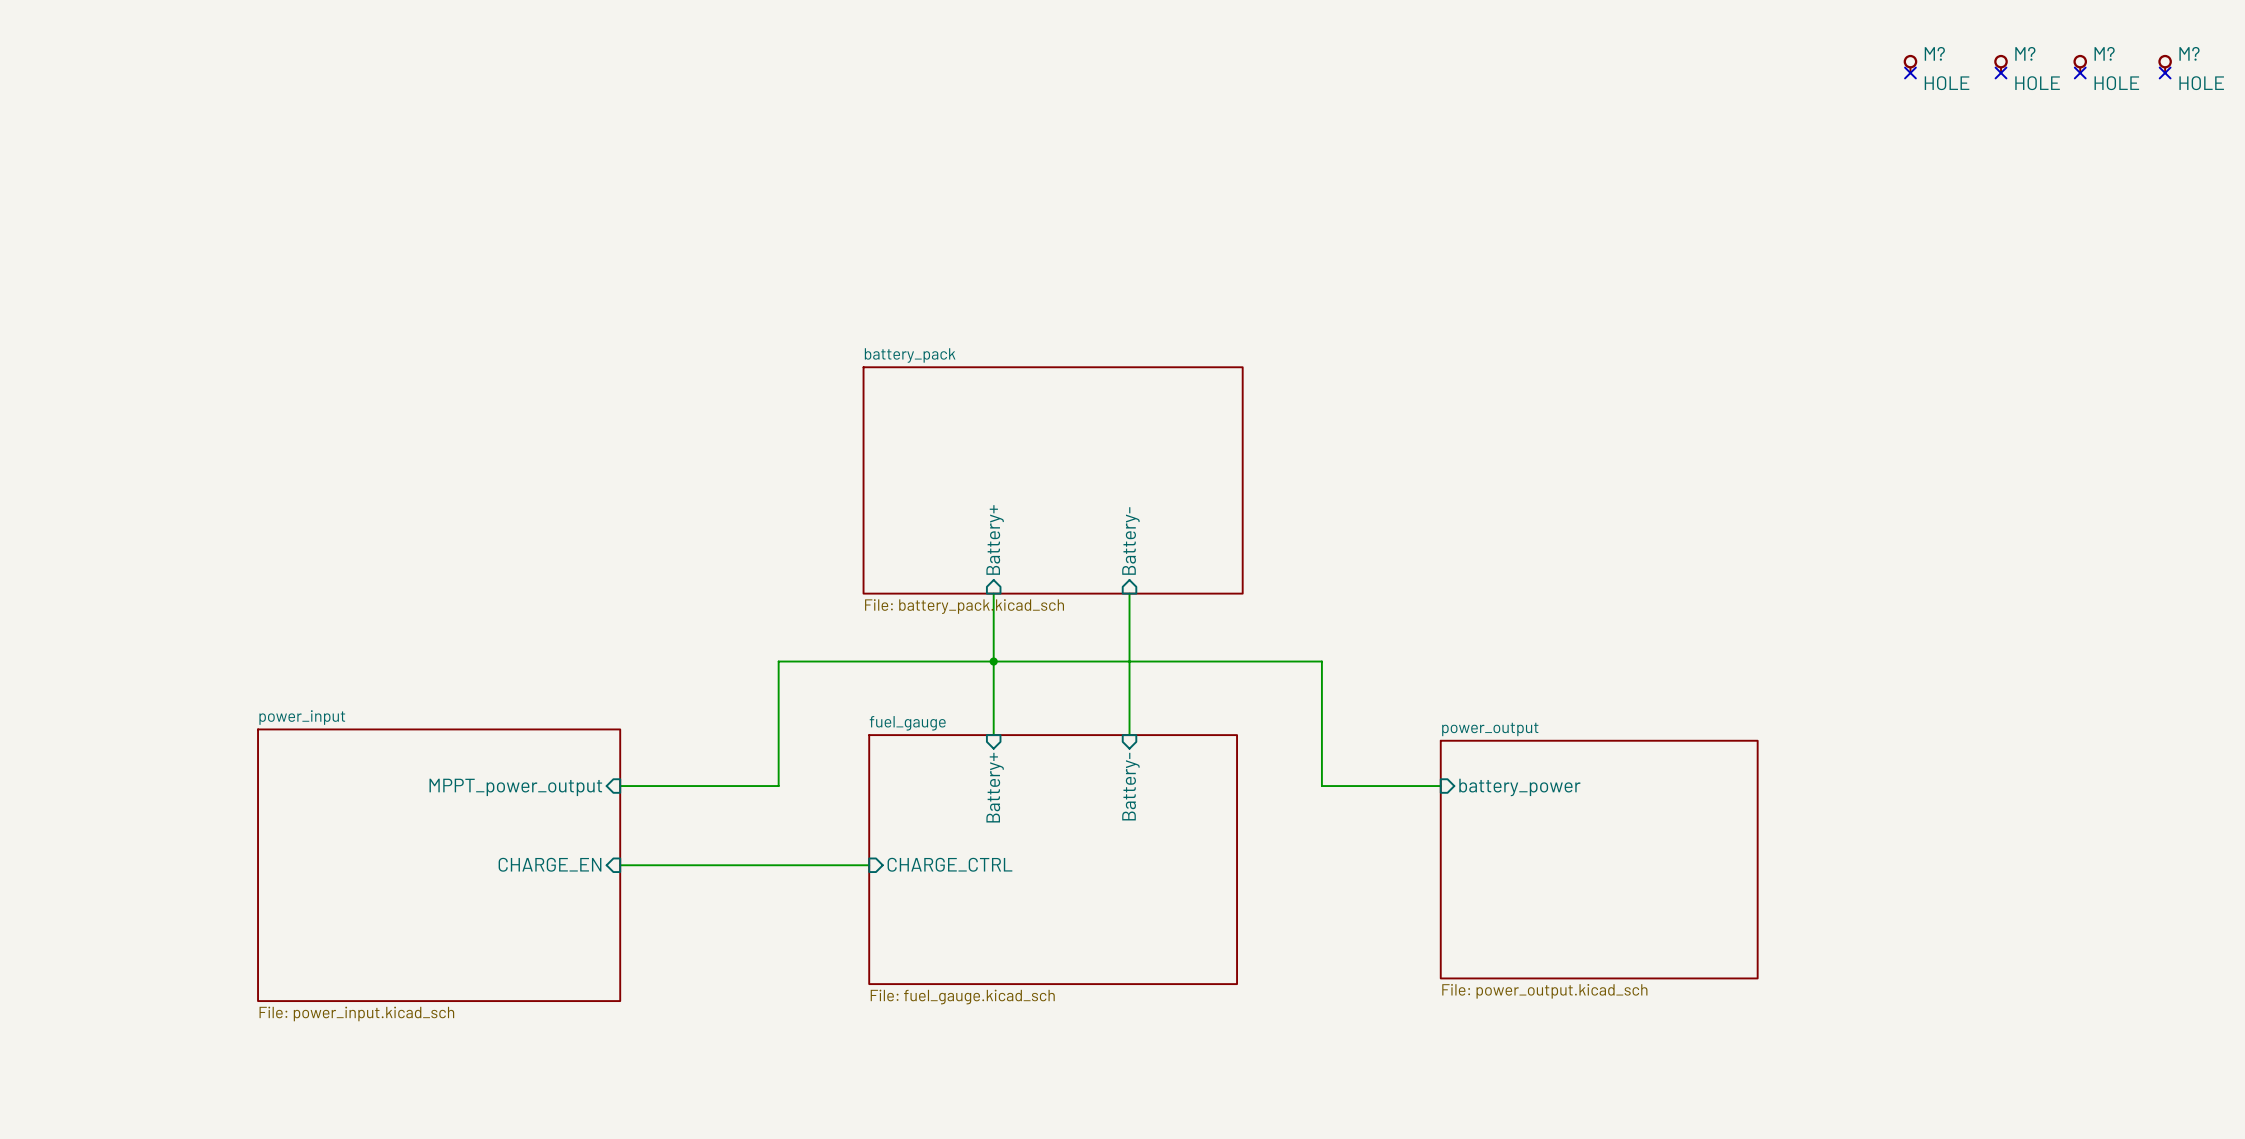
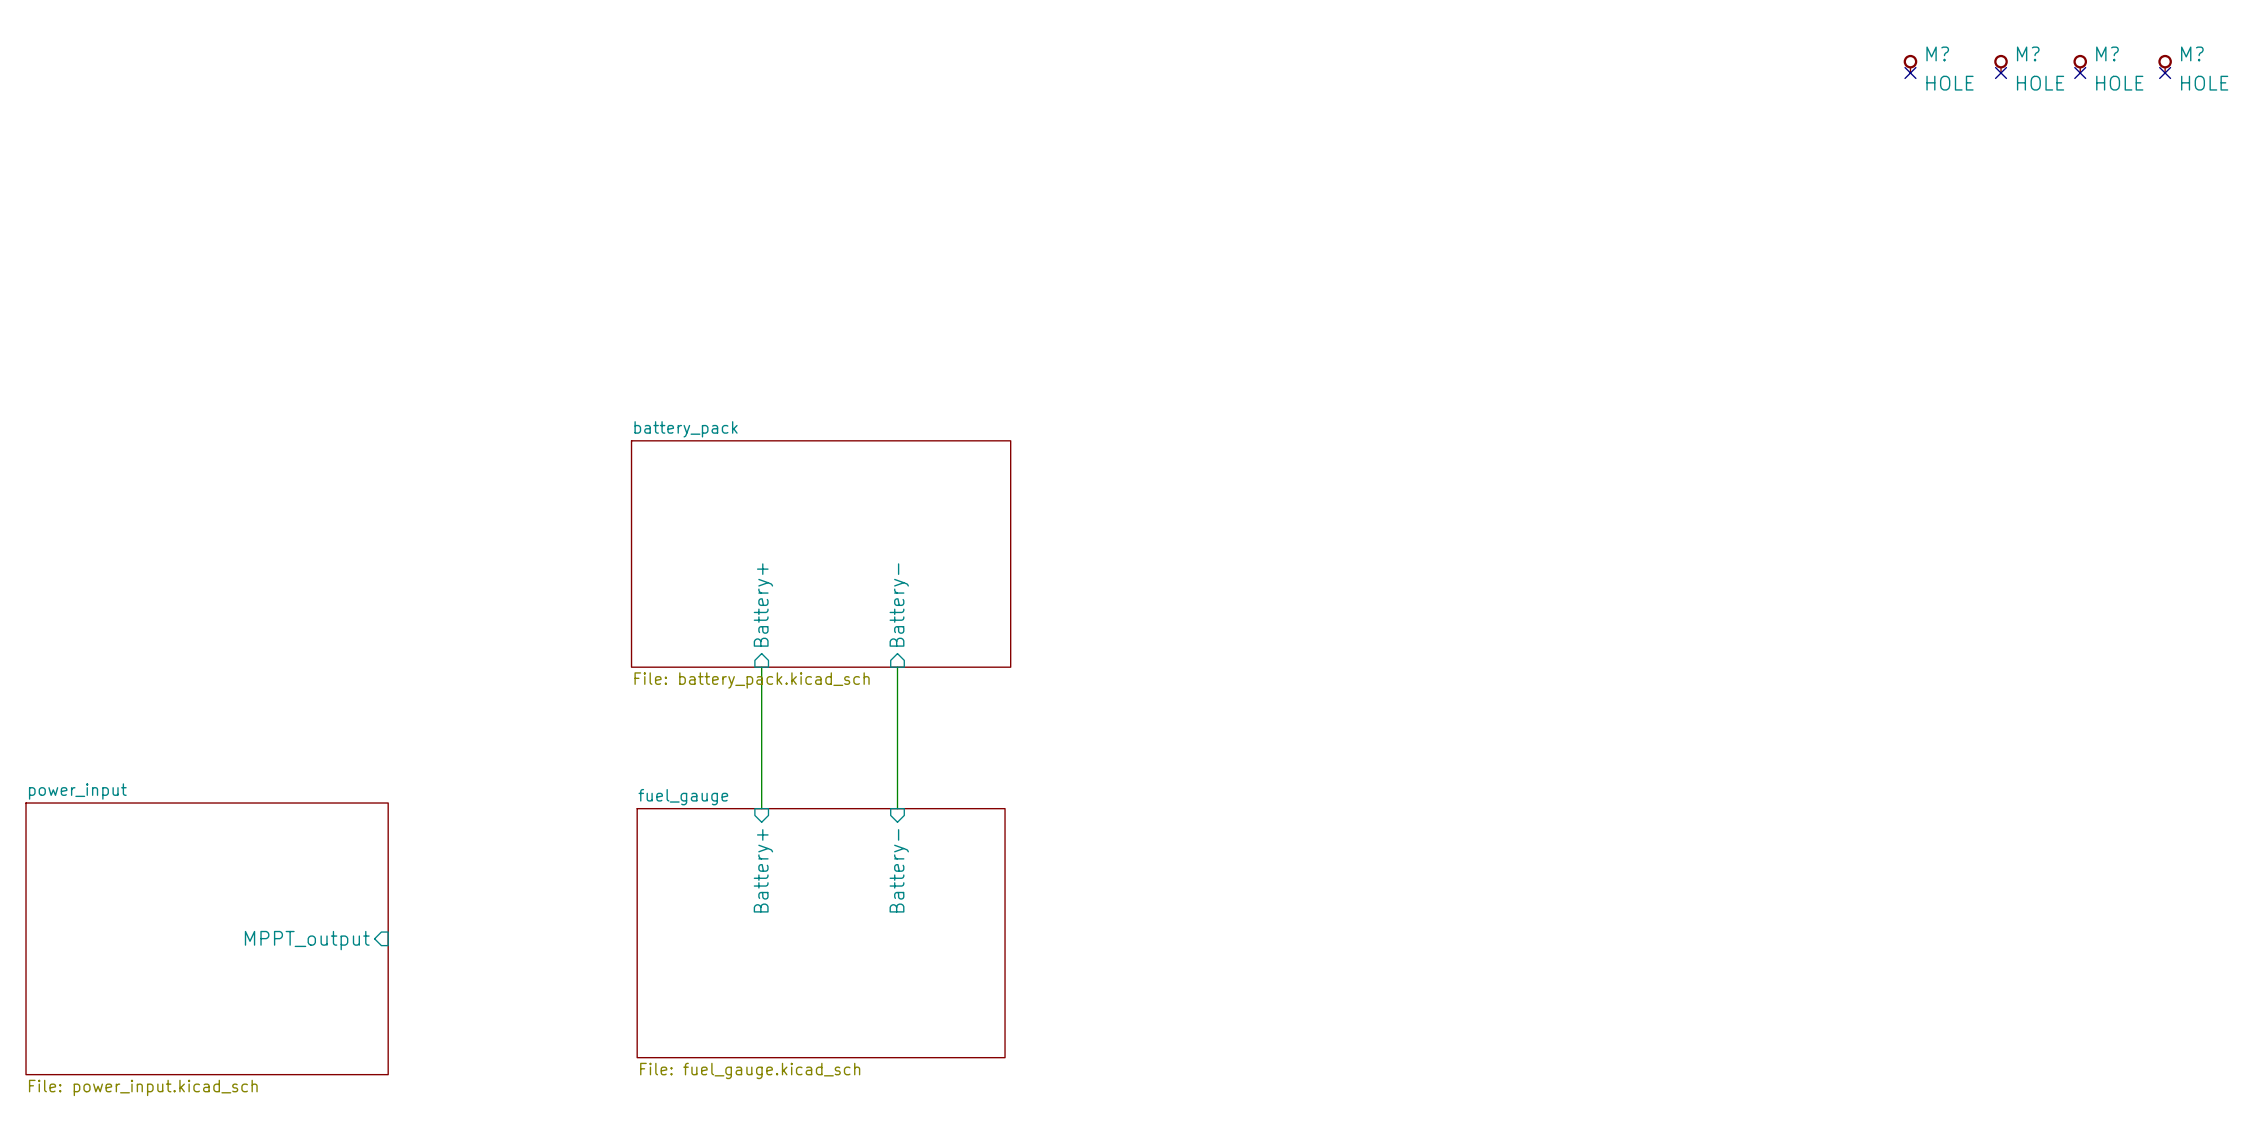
sheet battery_pack: File: battery_pack.kicad_sch (1053, 480) -> none
sheet pin: Battery+ (995, 539) -> none
sheet pin: Battery- (1130, 541) -> none
sheet battery_pack: none -> File: battery_pack.kicad_sch (821, 554)
wire: (993, 593) (993, 735) -> (897, 667) (897, 808)
wire: (1129, 593) (1129, 735) -> none
sheet pin: none -> Battery+ (763, 605)
sheet pin: none -> Battery- (899, 605)
junction: (993, 661) -> none
wire: none -> (761, 667) (761, 808)
wire: (620, 786) (778, 786) (778, 661) (1321, 661) (1321, 786) (1440, 786) -> none
sheet pin: Battery- (1130, 786) -> none
sheet pin: MPPT_power_output (515, 787) -> none
sheet pin: Battery+ (995, 787) -> none
sheet pin: battery_power (1519, 787) -> none
sheet fuel_gauge: File: fuel_gauge.kicad_sch (1053, 859) -> none
sheet power_output: File: power_output.kicad_sch (1599, 859) -> none
sheet pin: none -> Battery- (899, 870)
sheet pin: none -> Battery+ (763, 870)
sheet pin: CHARGE_EN (550, 864) -> none
sheet pin: CHARGE_CTRL (949, 864) -> none
sheet power_input: File: power_input.kicad_sch (439, 865) -> none
wire: (620, 865) (869, 865) -> none
sheet fuel_gauge: none -> File: fuel_gauge.kicad_sch (821, 933)
sheet power_input: none -> File: power_input.kicad_sch (207, 938)
sheet pin: none -> MPPT_output (307, 940)

